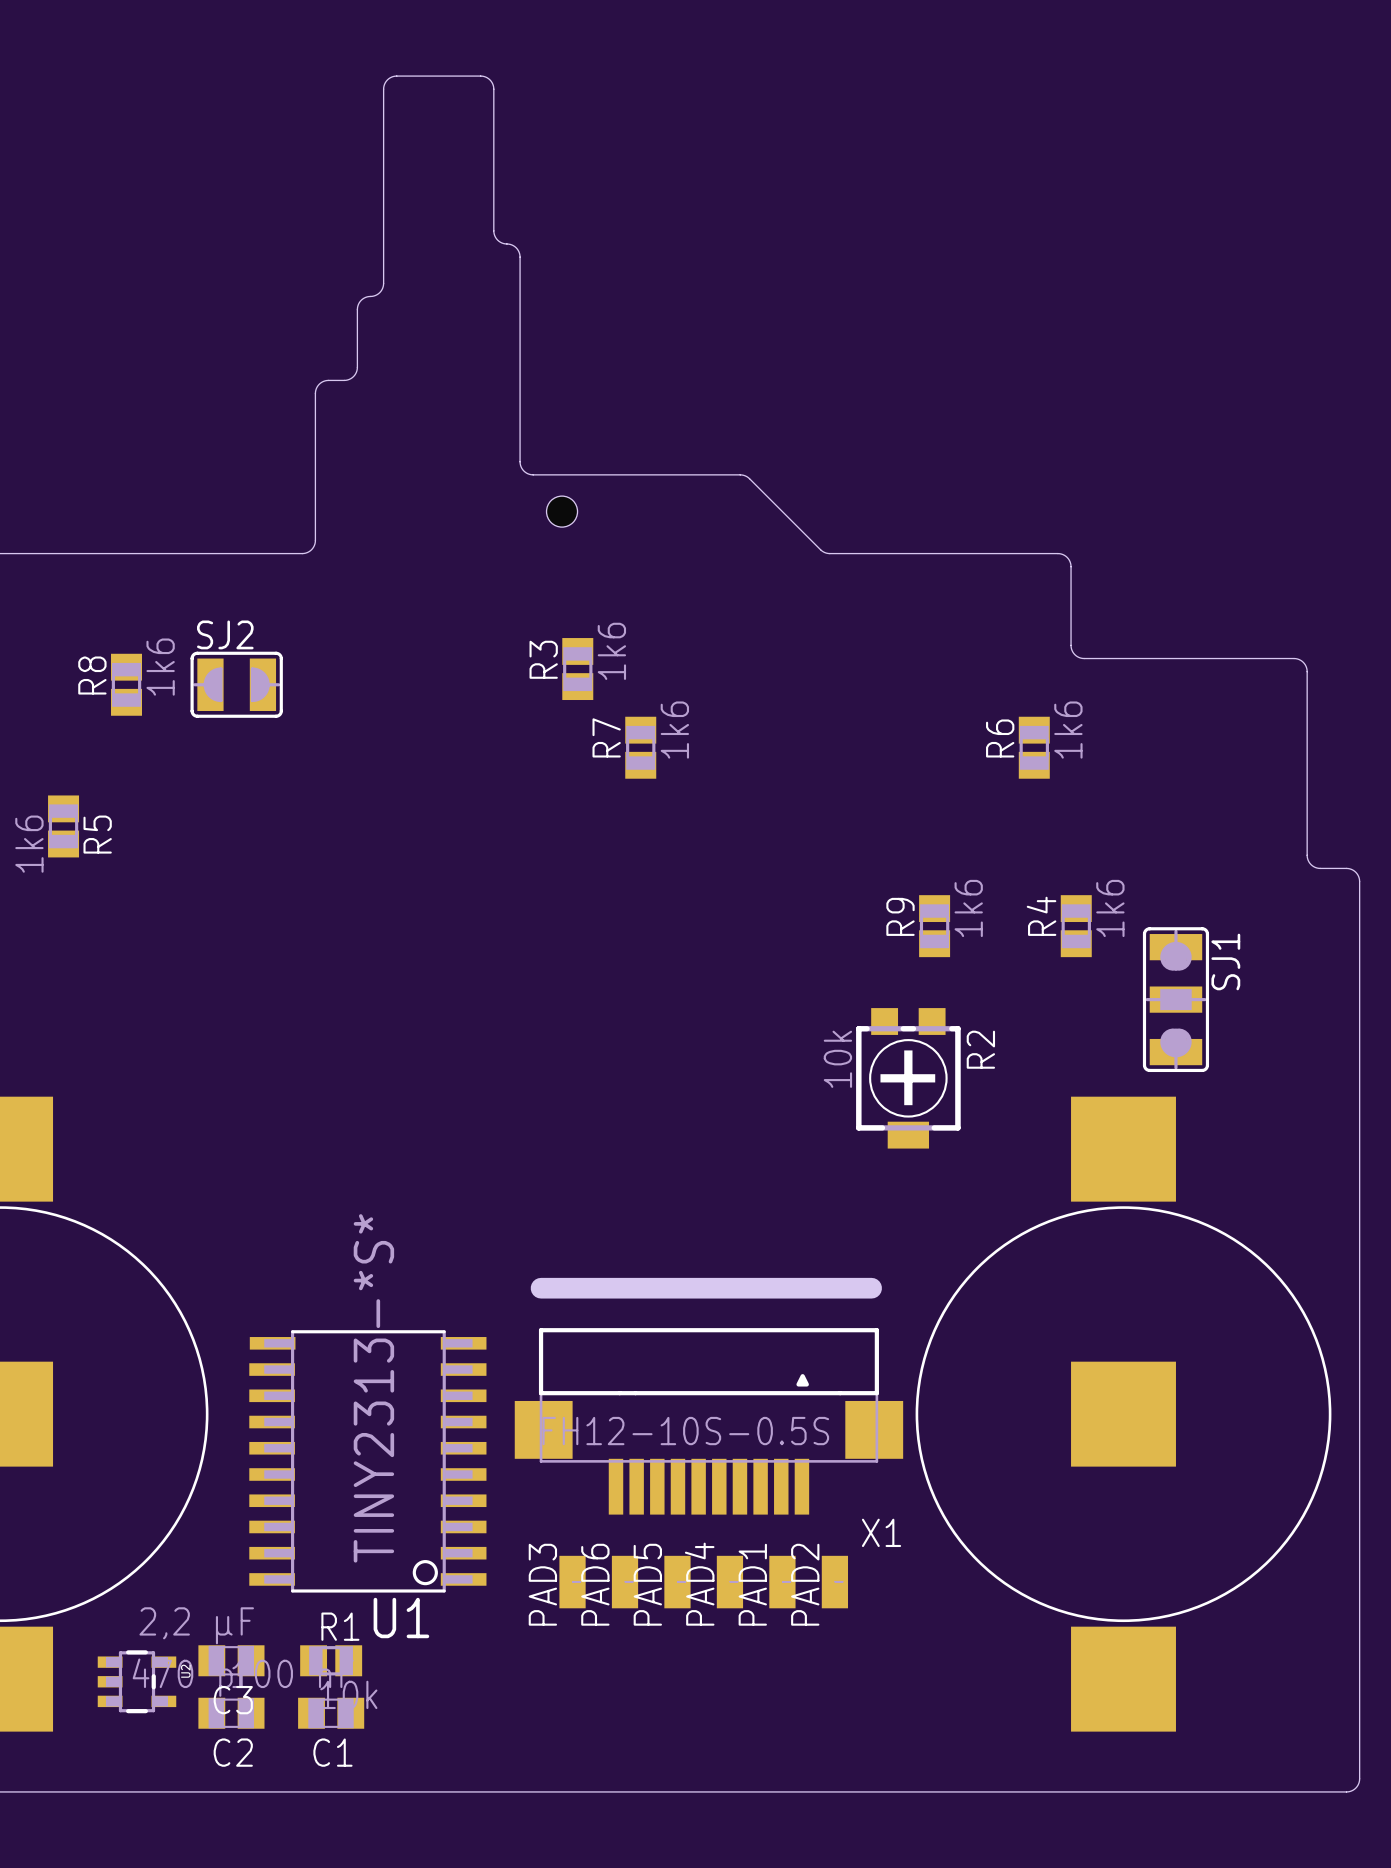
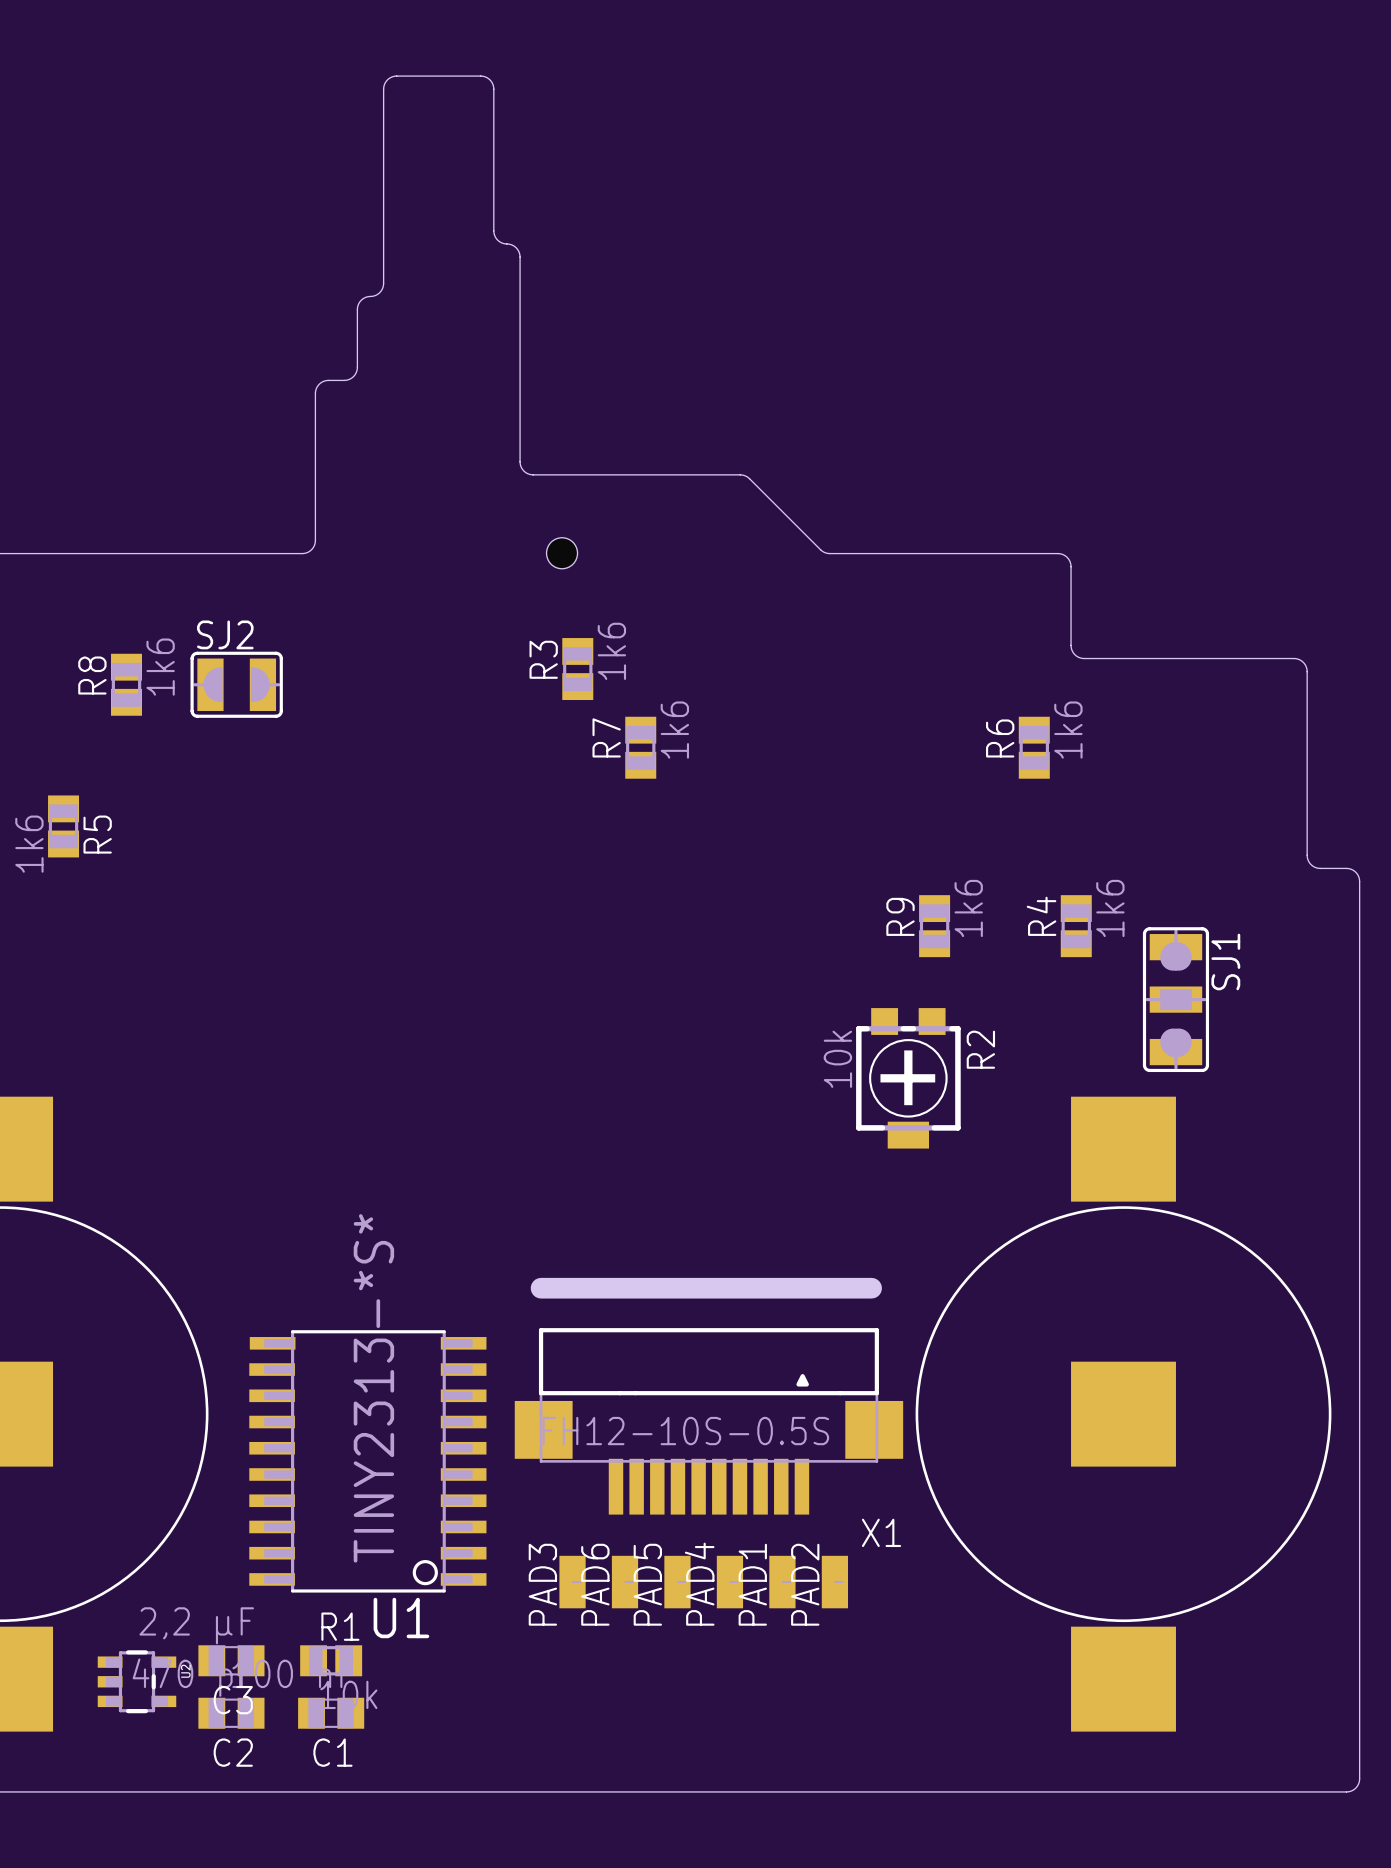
hole position: (562, 511) -> (562, 553)

